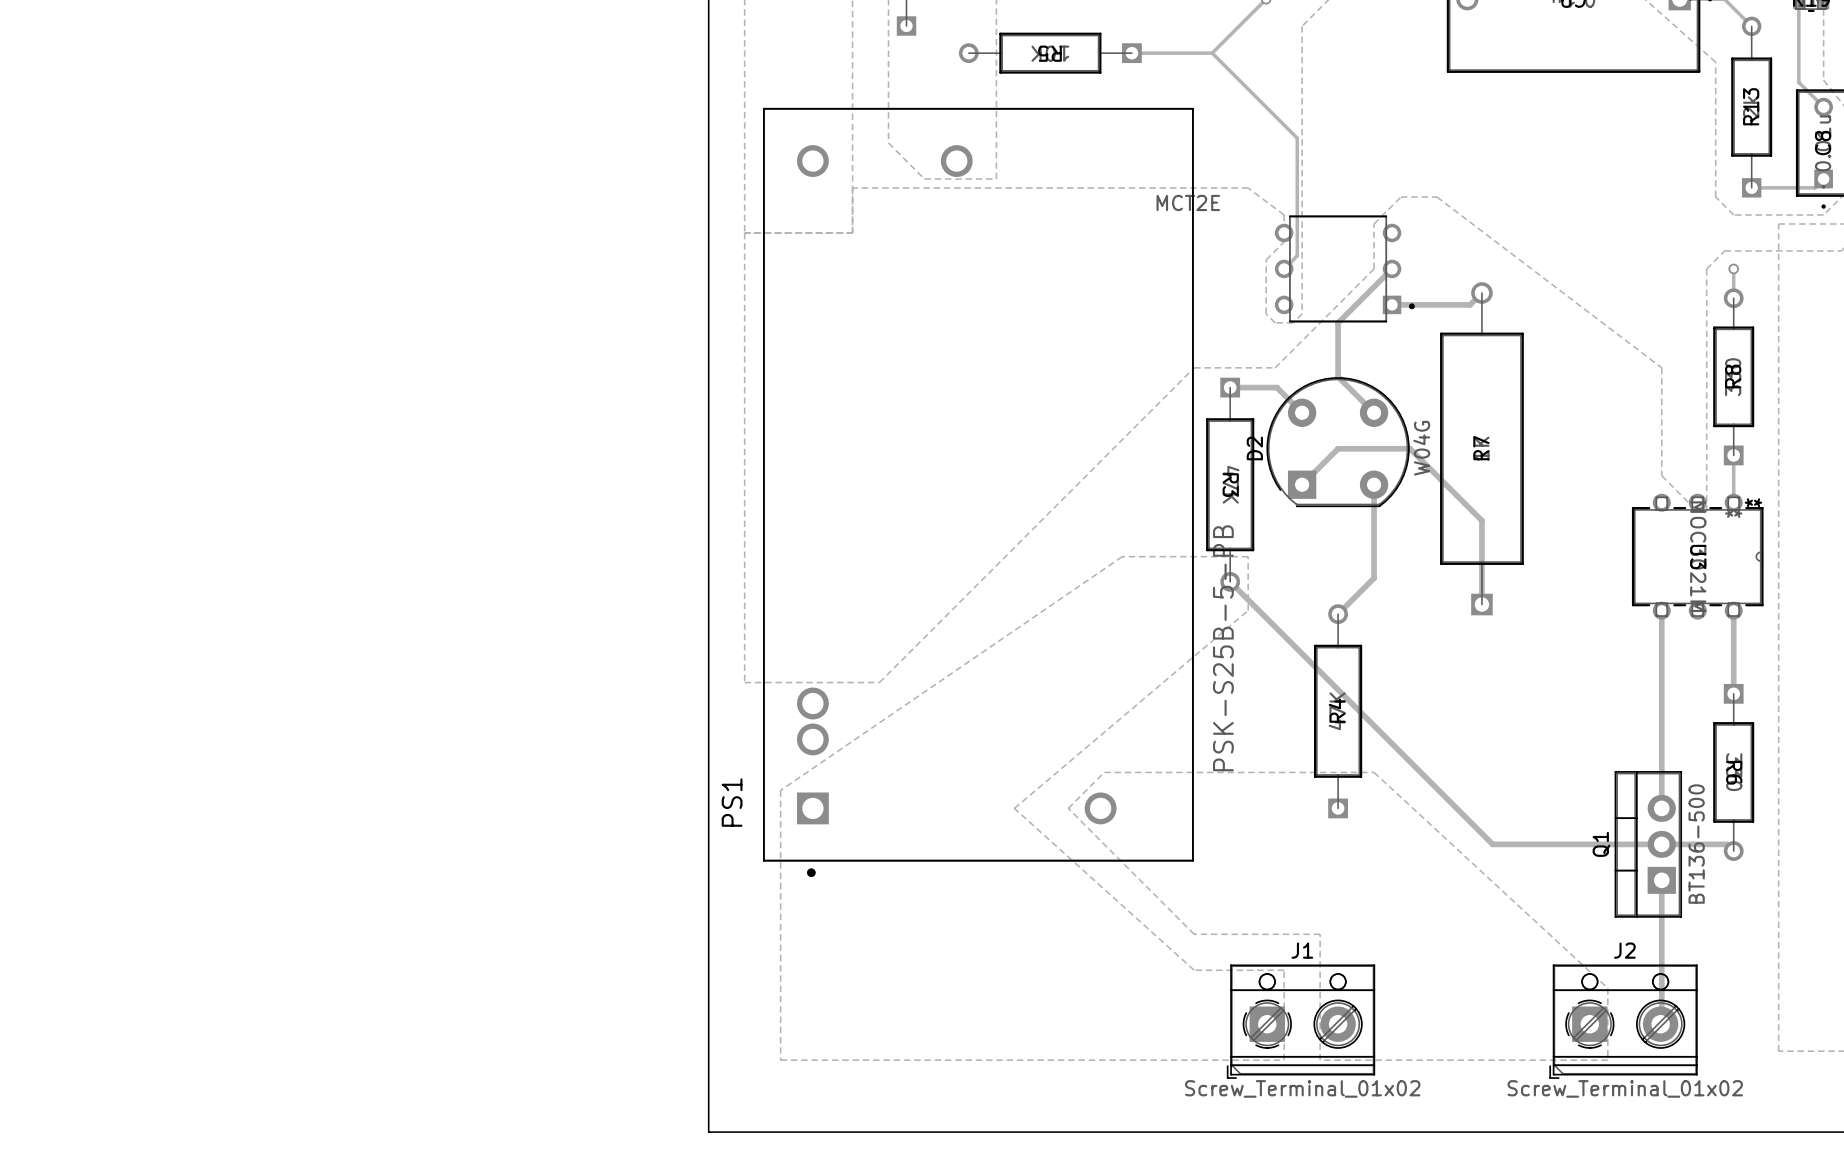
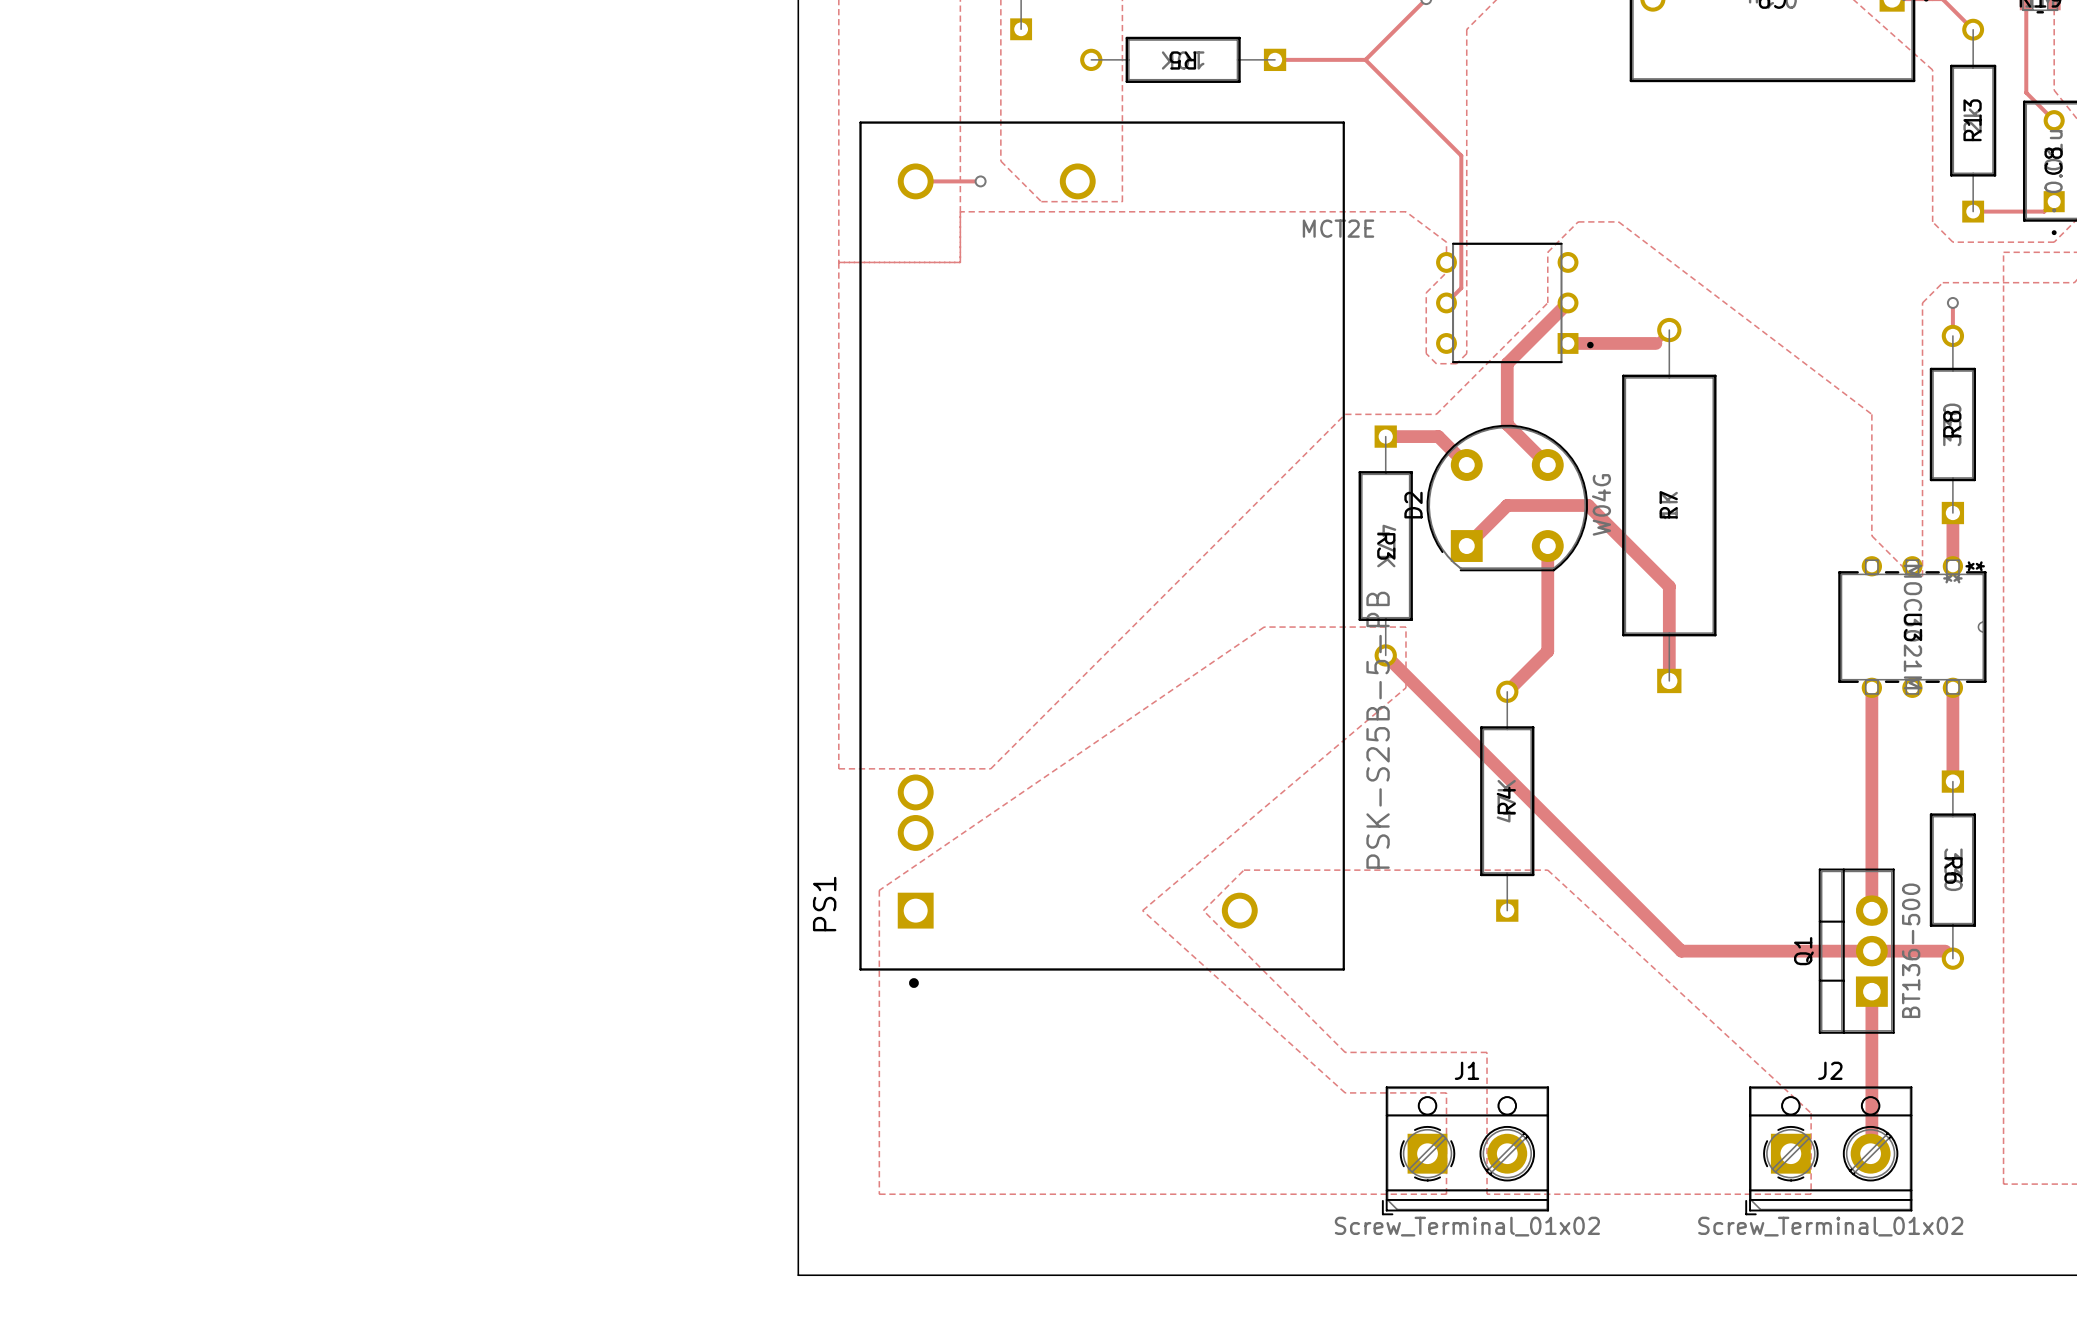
track: none -> (915, 181) (980, 181)
via: none -> (980, 181)
track width: thin (1392, 268) (1338, 322) (1338, 376) (1374, 412) -> thick (1568, 302) (1507, 363) (1507, 424) (1547, 465)
track width: thin (1392, 304) (1470, 304) -> thick (1568, 343) (1655, 343)
track width: thin (1230, 387) (1276, 387) (1302, 412) -> thick (1385, 436) (1438, 436) (1466, 465)
track width: thin (1733, 455) (1733, 502) -> thick (1952, 513) (1952, 566)
track width: thin (1302, 484) (1338, 448) (1410, 448) (1481, 520) (1481, 604) -> thick (1466, 546) (1507, 505) (1588, 505) (1669, 586) (1669, 680)
track width: thin (1374, 484) (1374, 578) (1338, 614) -> thick (1547, 546) (1547, 651) (1507, 691)
track width: thin (1230, 581) (1492, 844) (1727, 844) -> thick (1385, 655) (1681, 951) (1945, 951)
track width: thin (1661, 610) (1661, 808) -> thick (1871, 687) (1871, 910)
track width: thin (1733, 610) (1733, 693) -> thick (1952, 687) (1952, 781)
track width: thin (1661, 880) (1661, 1023) -> thick (1871, 991) (1871, 1152)

